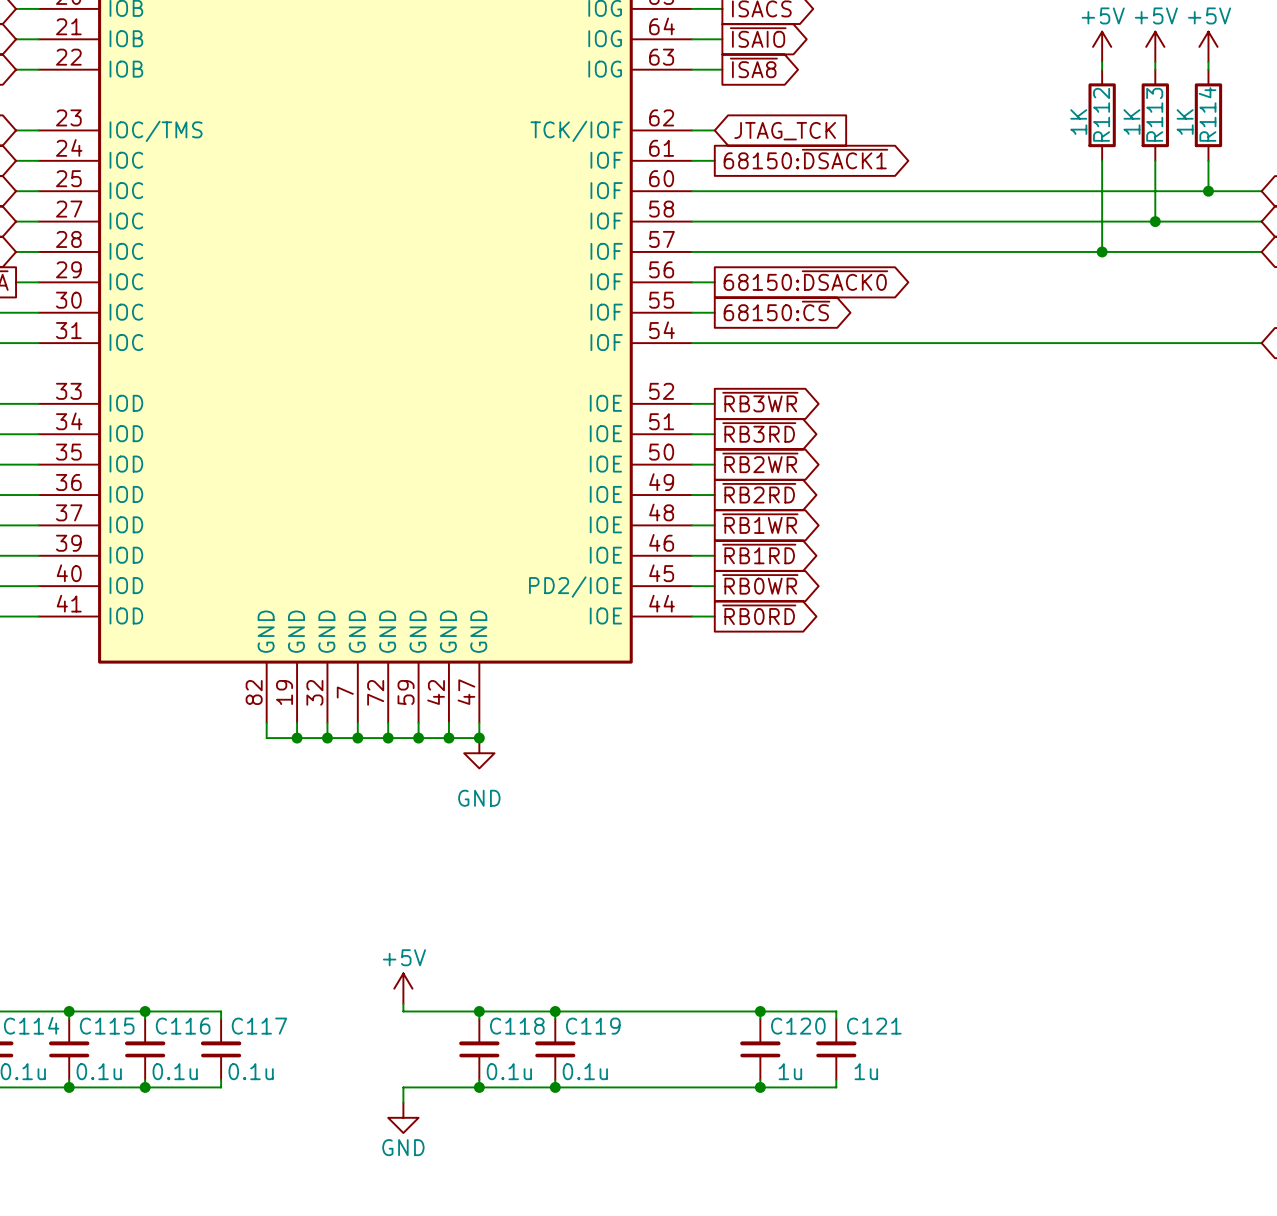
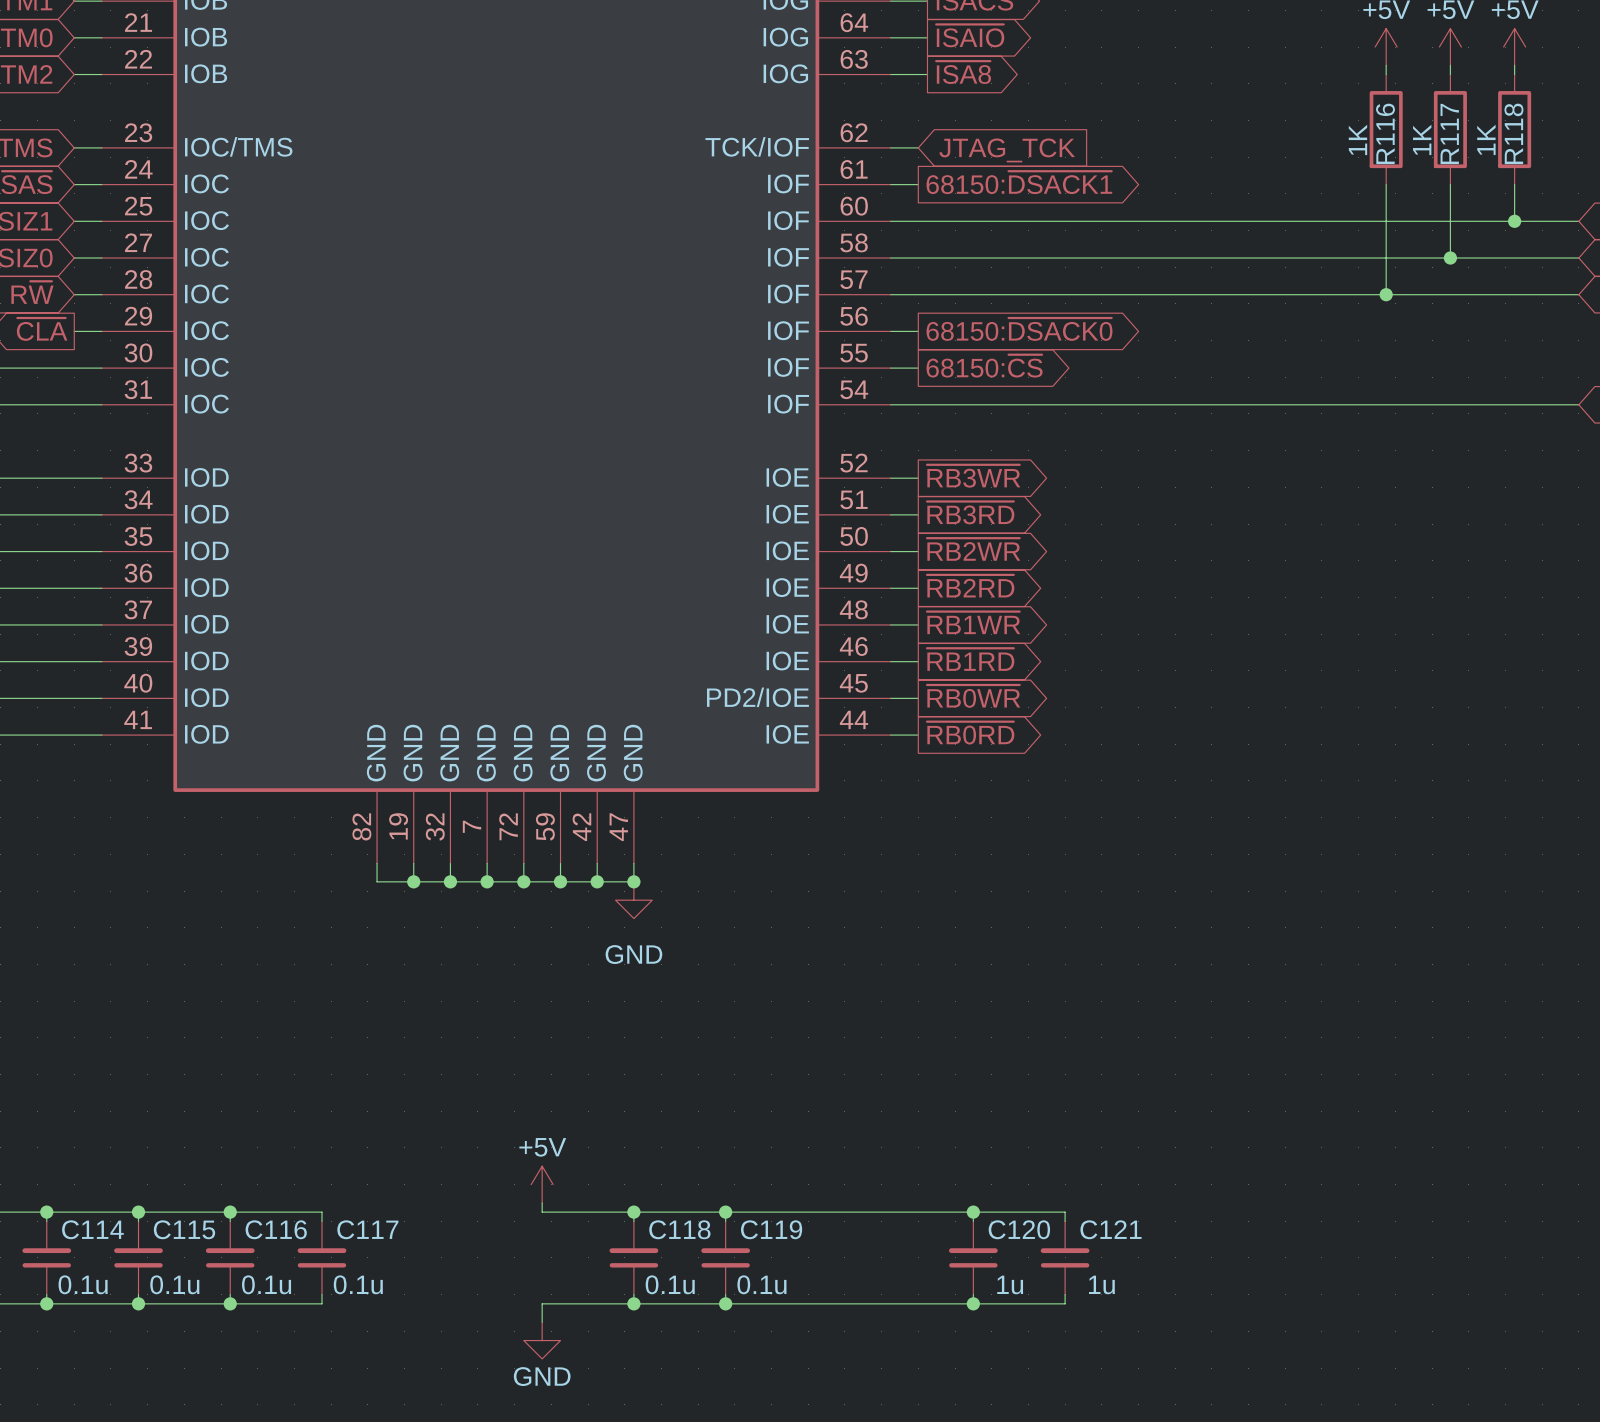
R112 name: R112 (1101, 114) -> R116 (1385, 133)
R113 name: R113 (1154, 114) -> R117 (1449, 133)
R114 name: R114 (1207, 114) -> R118 (1513, 133)

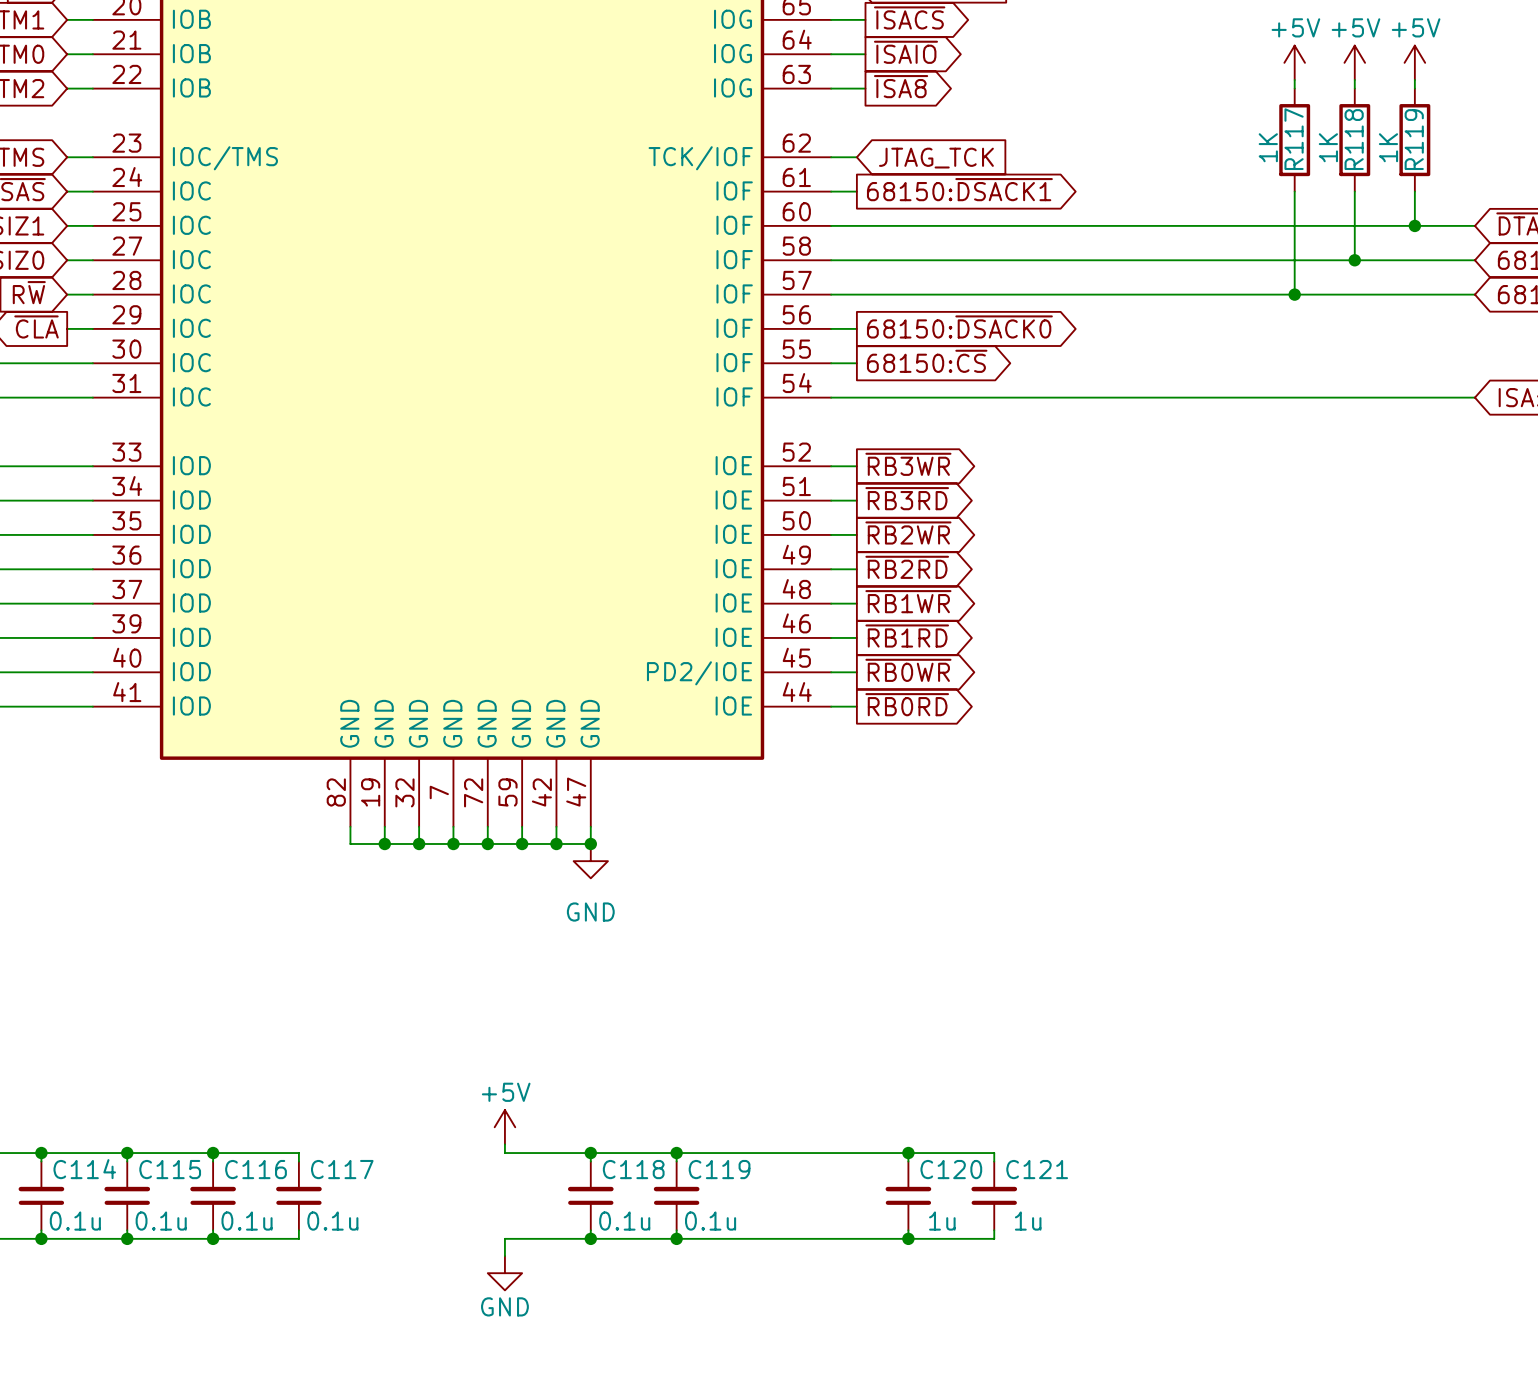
R116 name: R116 (1385, 133) -> R117 (1294, 139)
R117 name: R117 (1449, 133) -> R118 (1354, 139)
R118 name: R118 (1513, 133) -> R119 (1414, 139)

